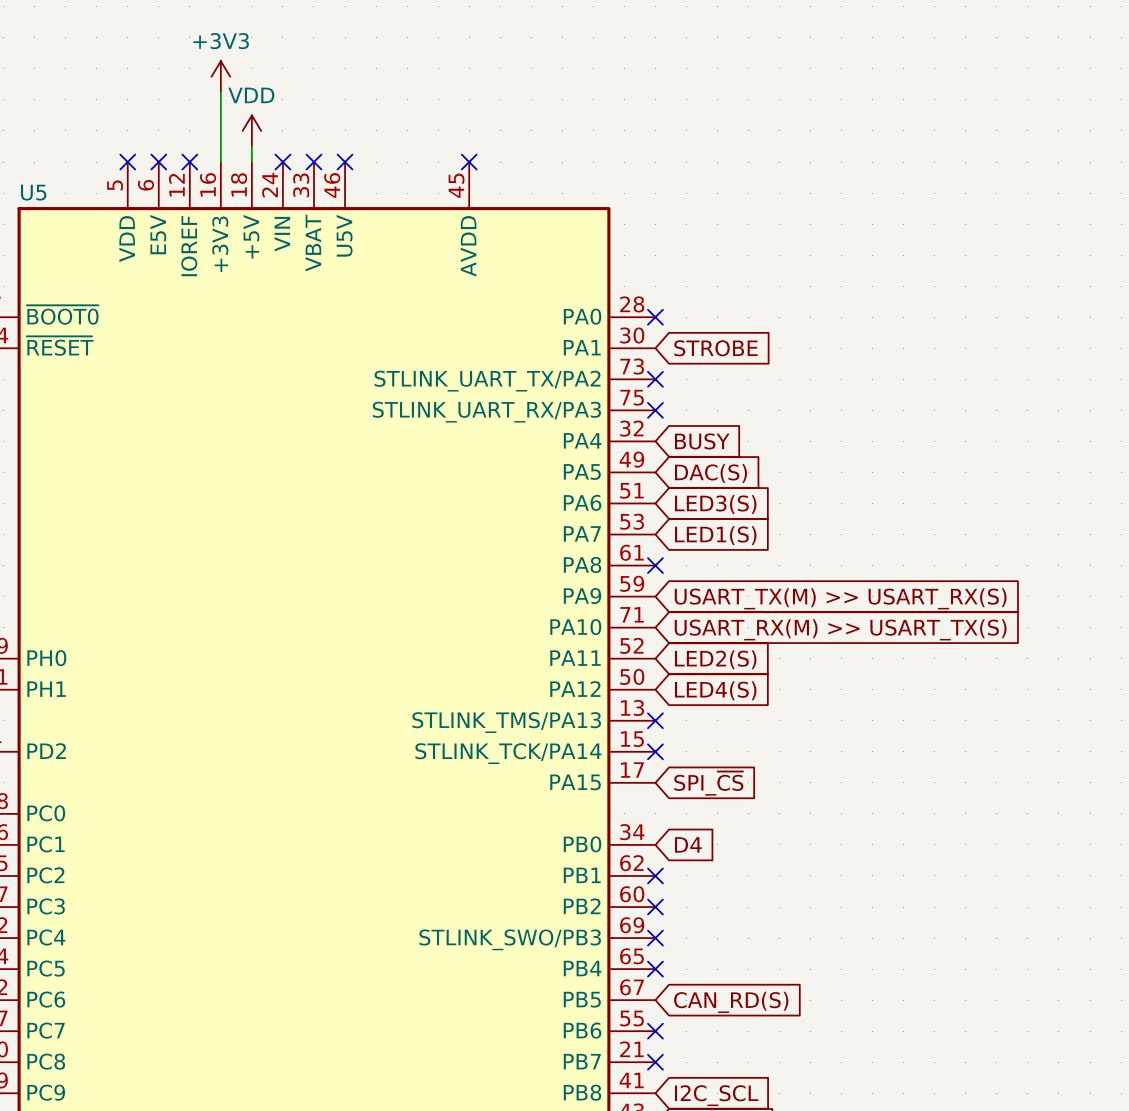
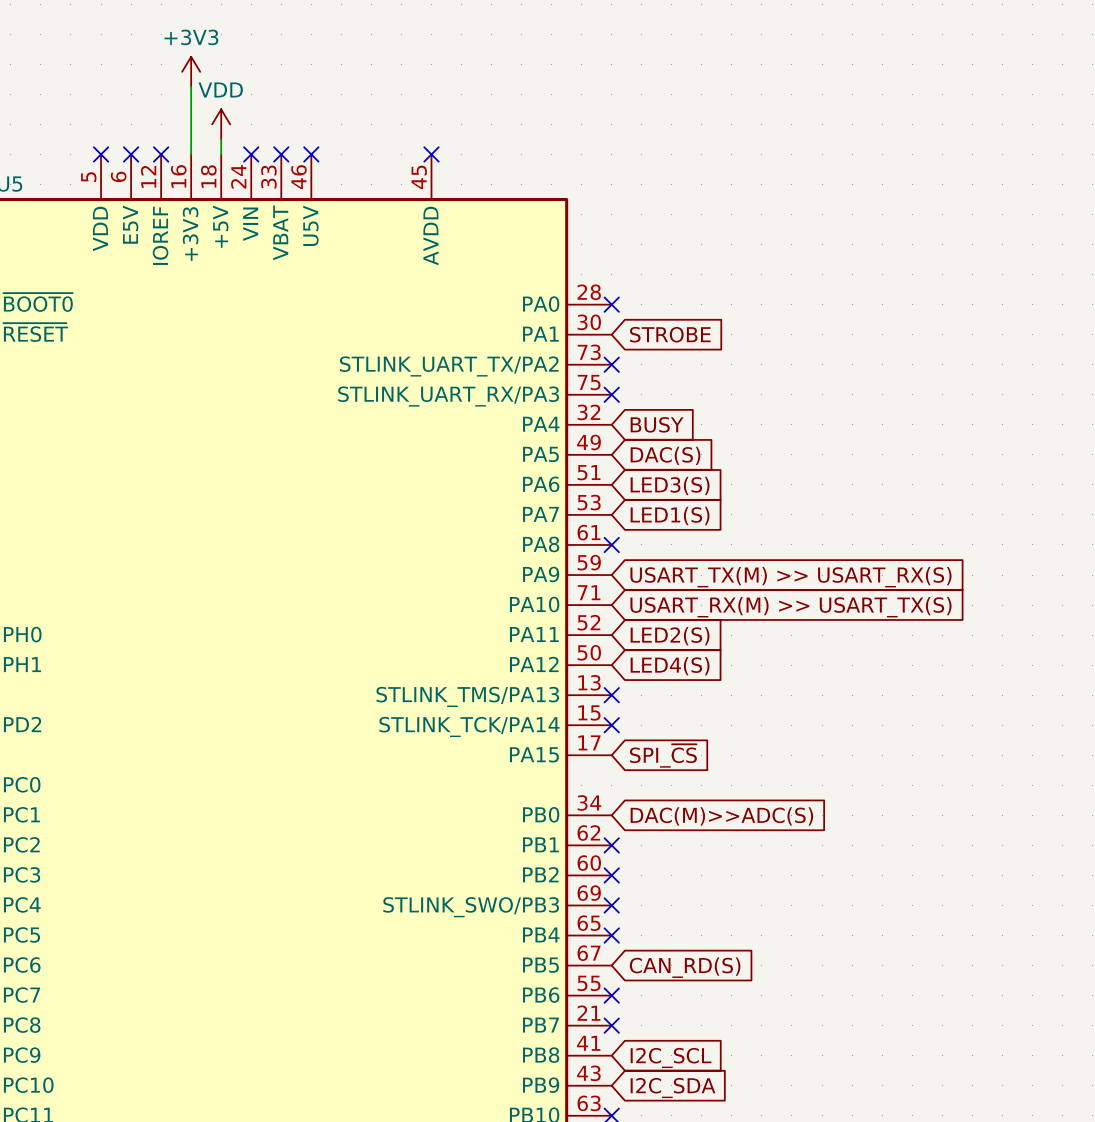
global label: D4 (688, 844) -> DAC(M)>>ADC(S) (721, 816)

